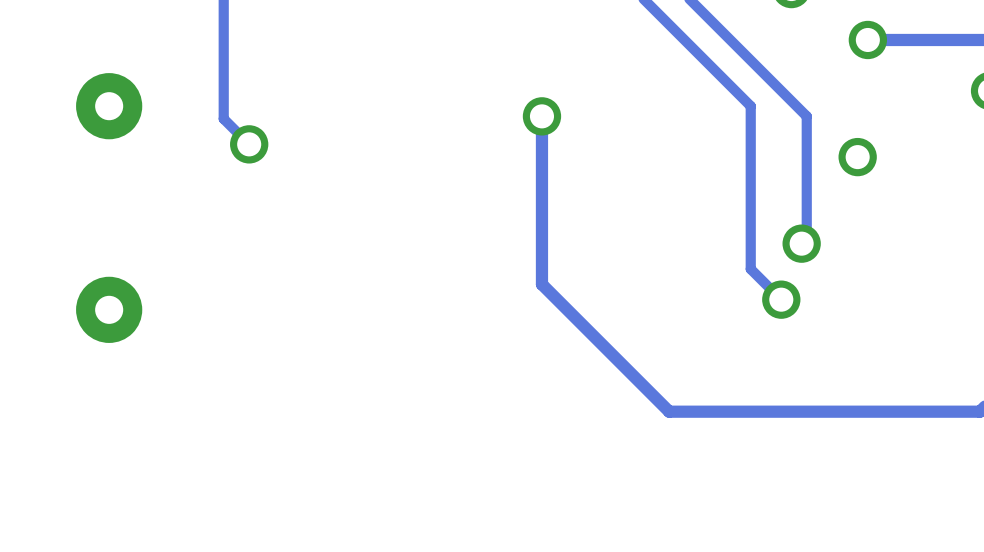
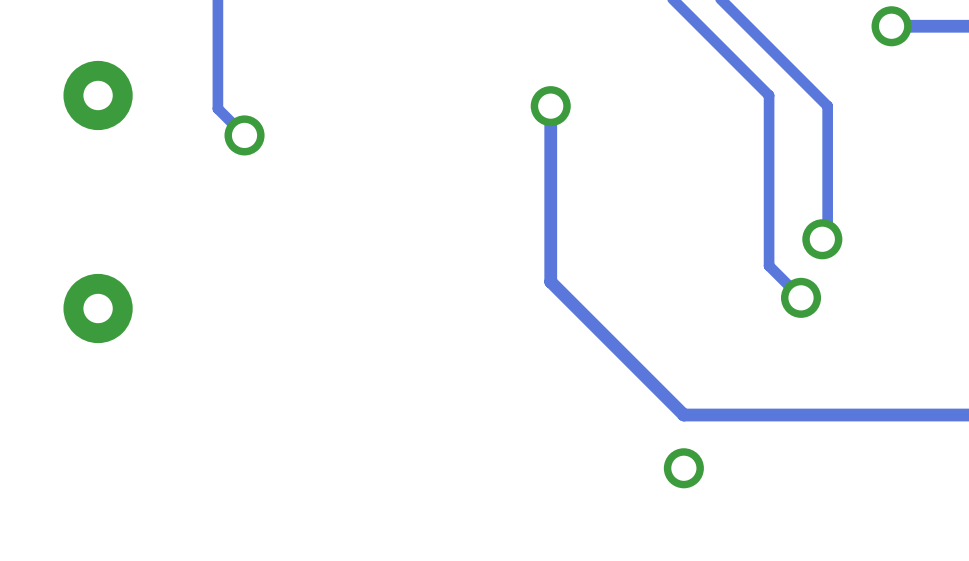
via: (857, 157) -> none
via: none -> (683, 468)

